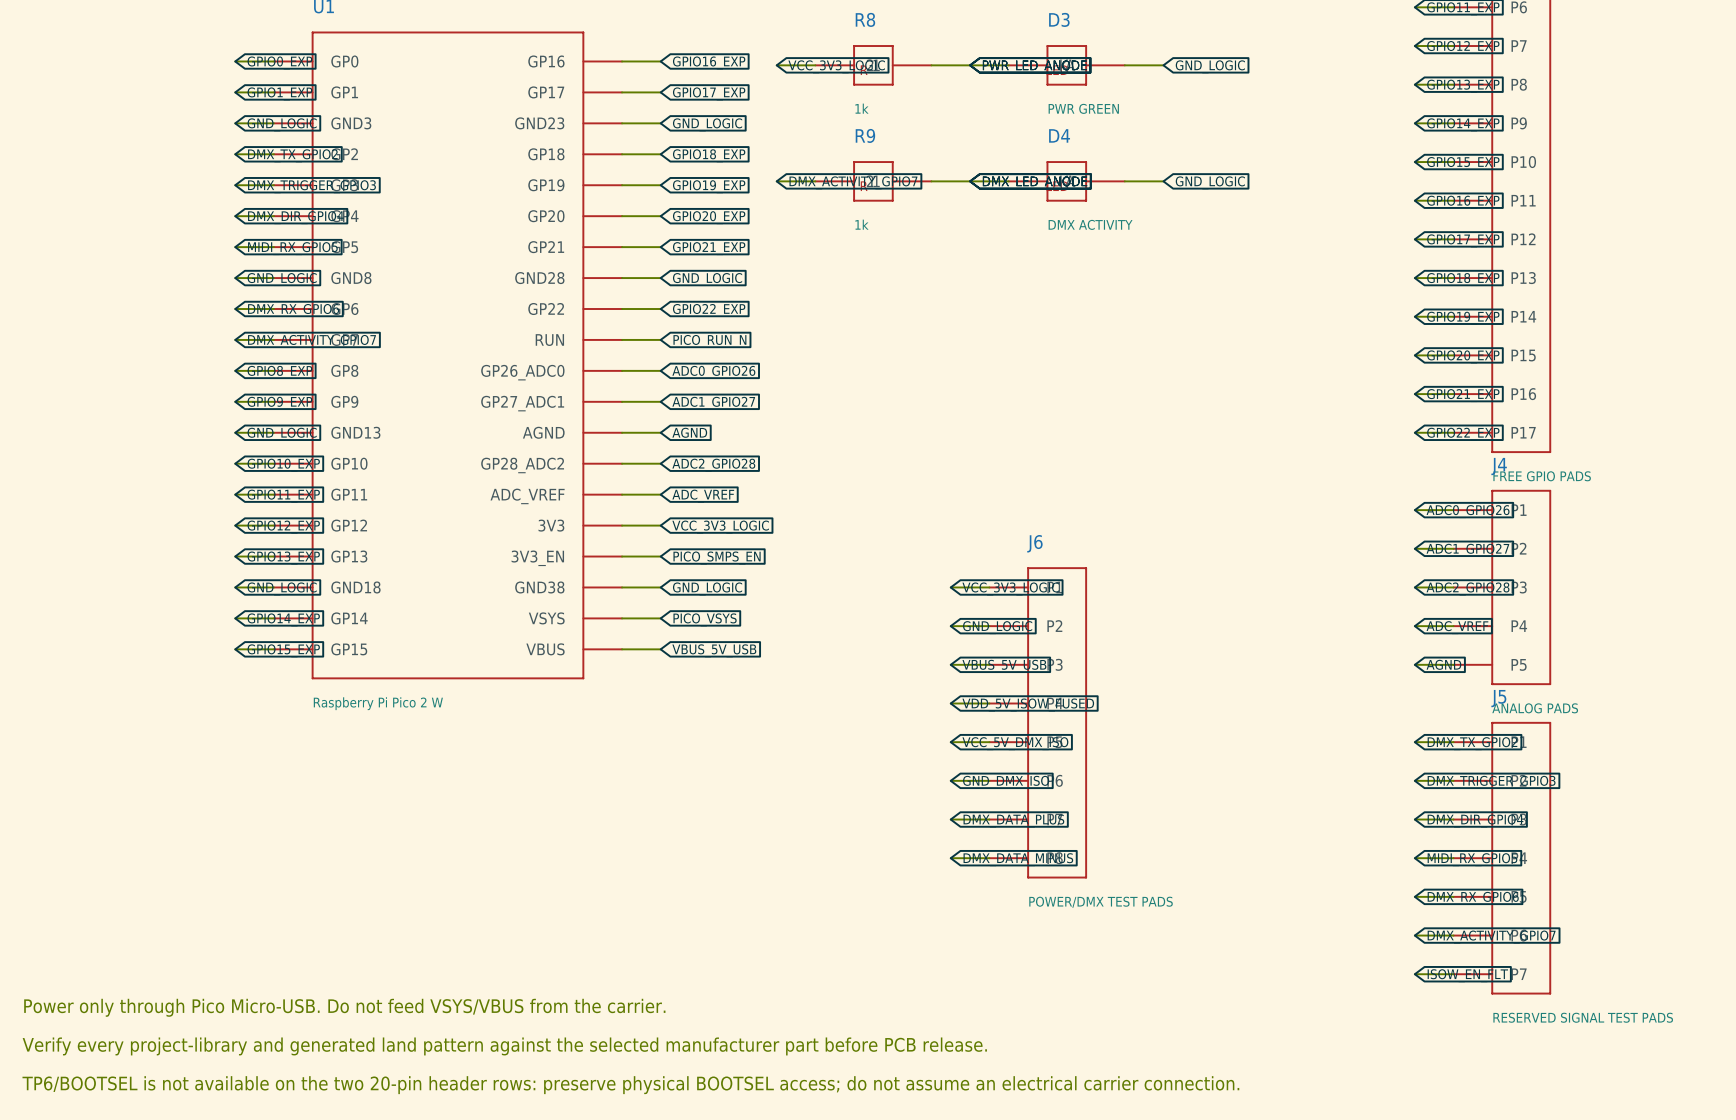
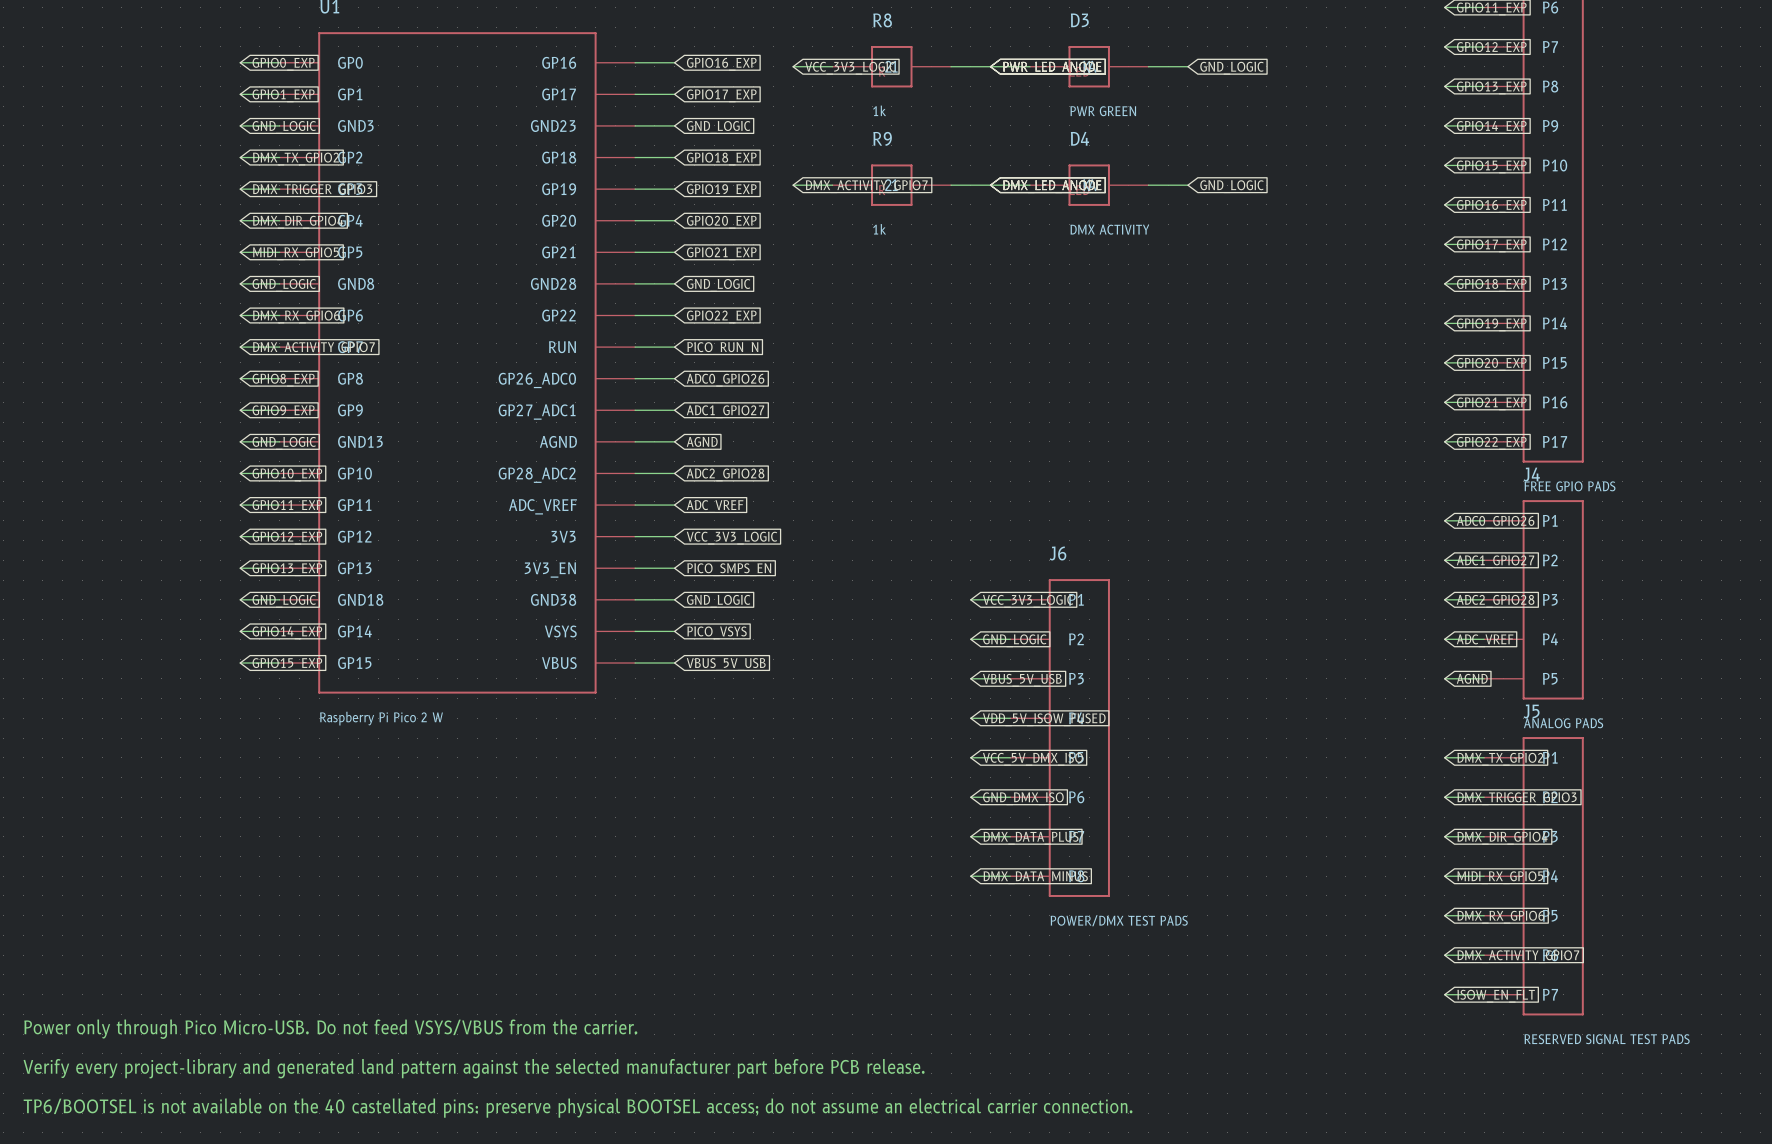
text: TP6/BOOTSEL is not available on the two 20-pin header rows: preserve physical BOOTSEL access; do not assume an electrical carrier connection. (630, 1085) -> TP6/BOOTSEL is not available on the 40 castellated pins: preserve physical BOOTSEL access; do not assume an electrical carrier connection. (578, 1108)

